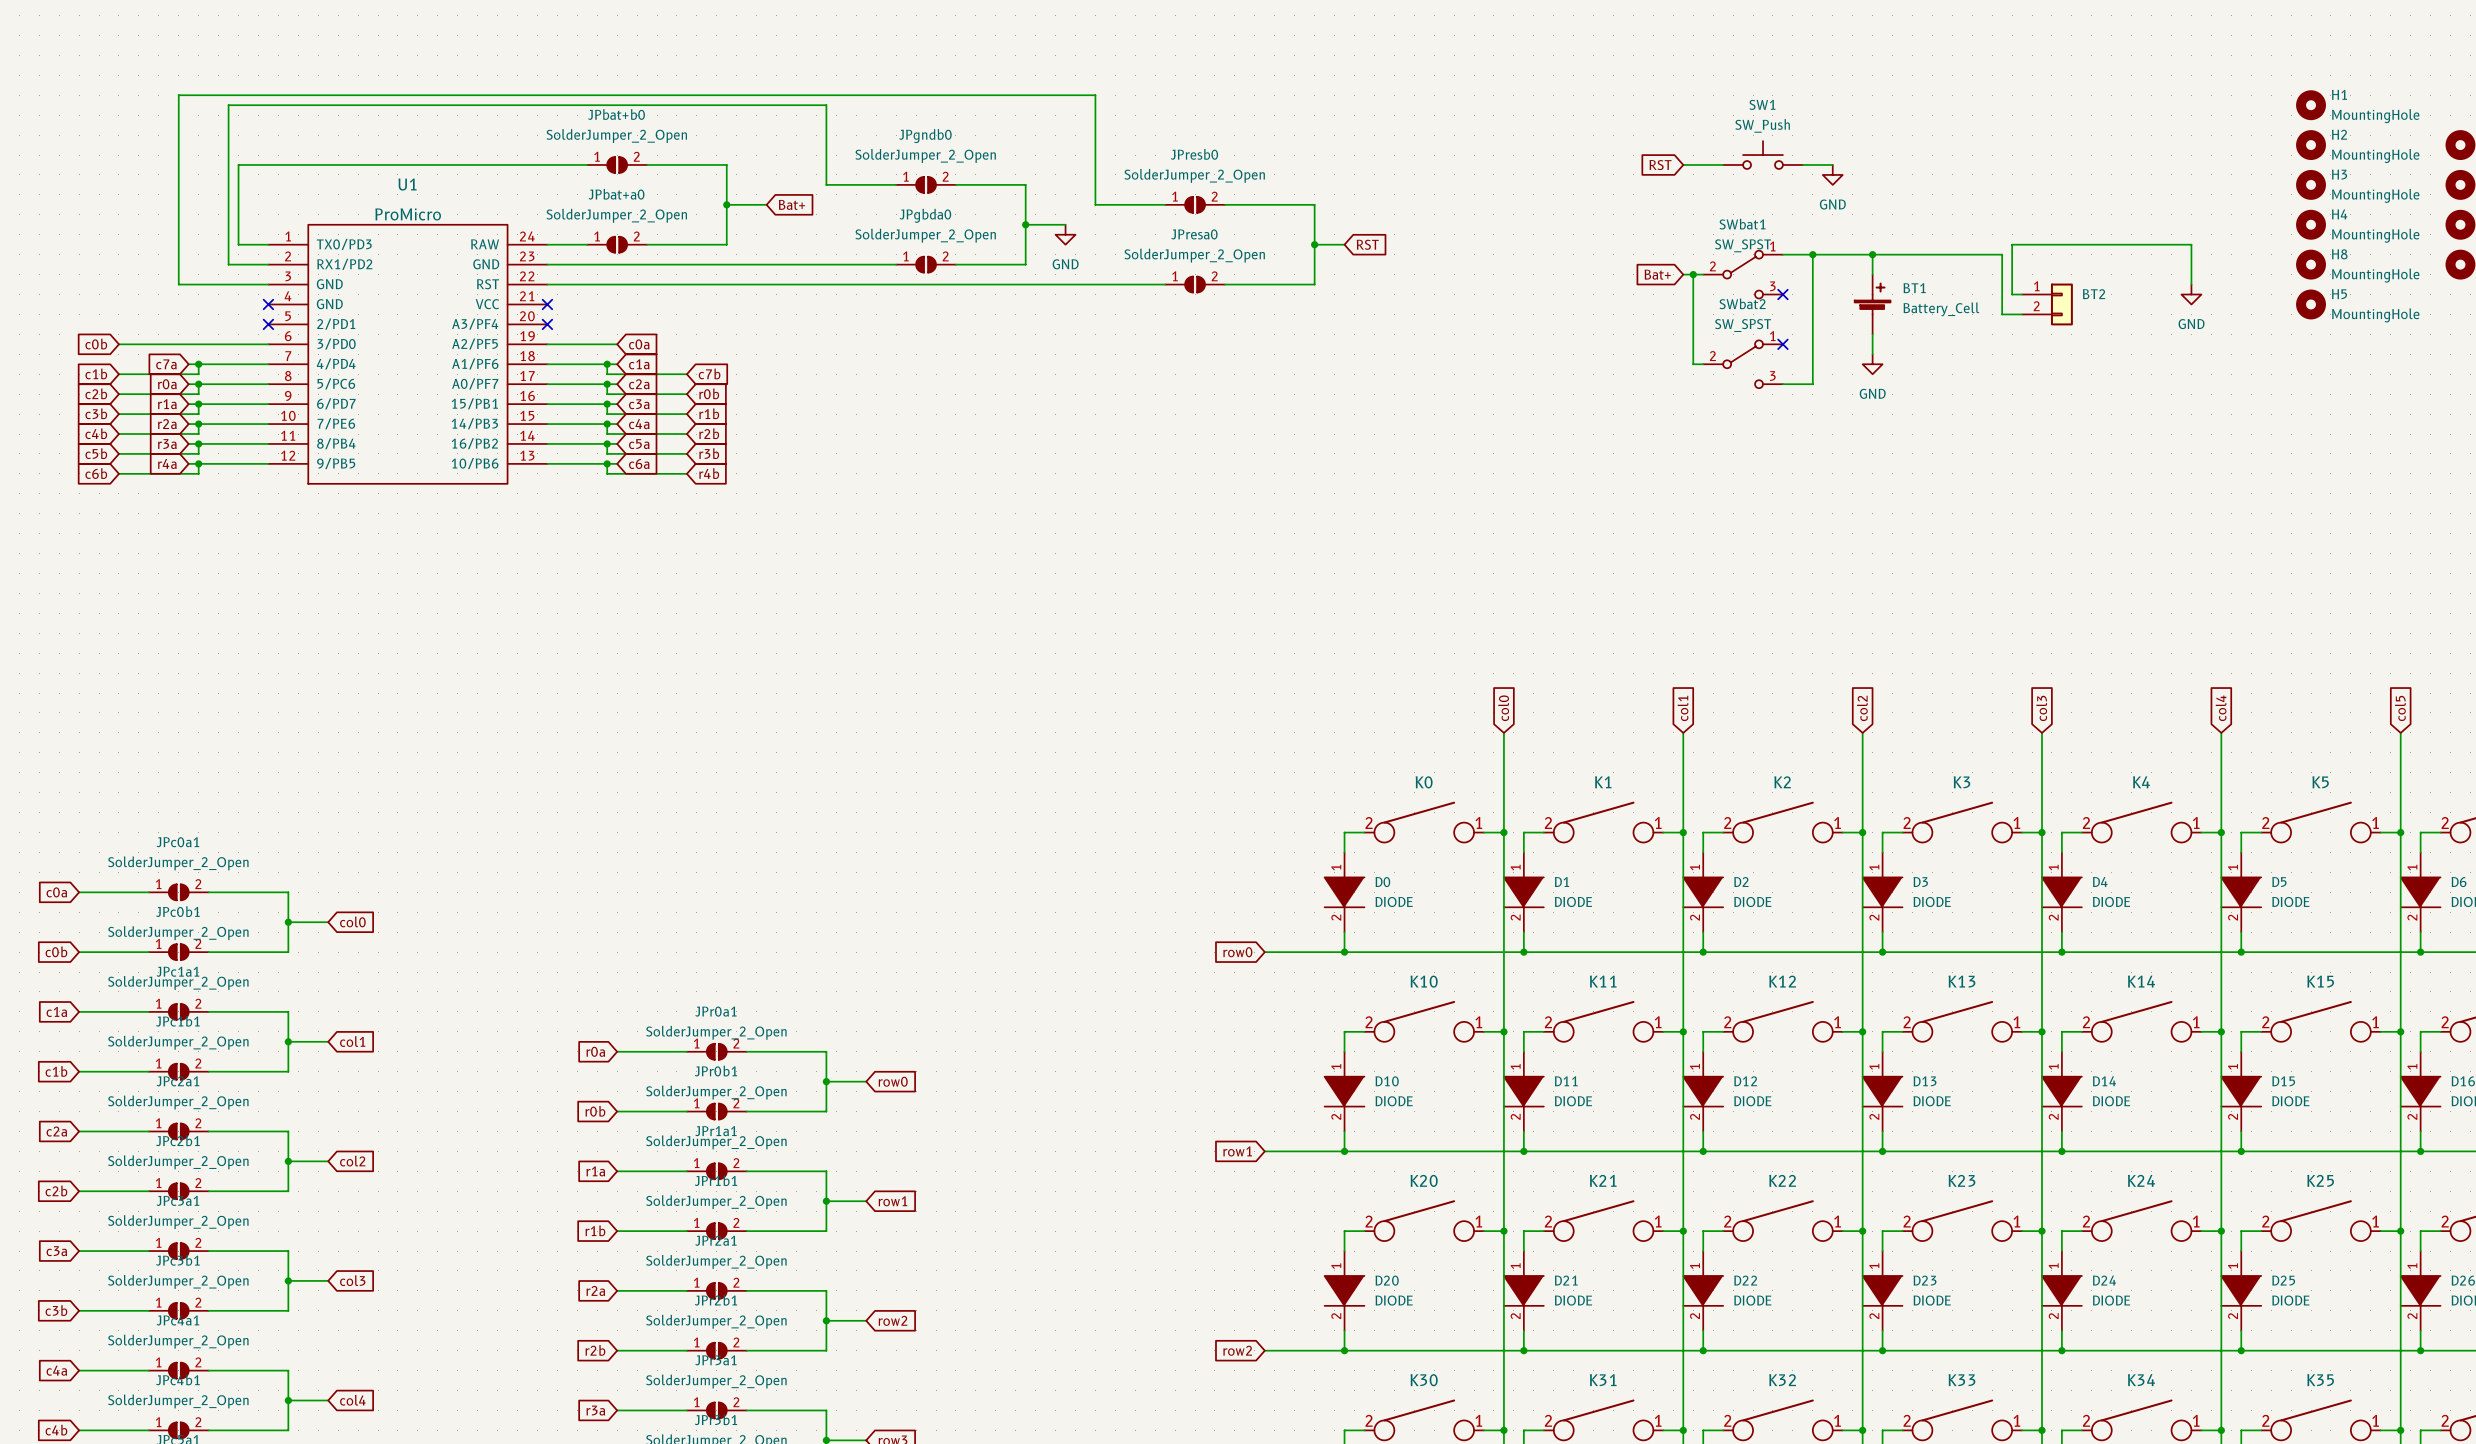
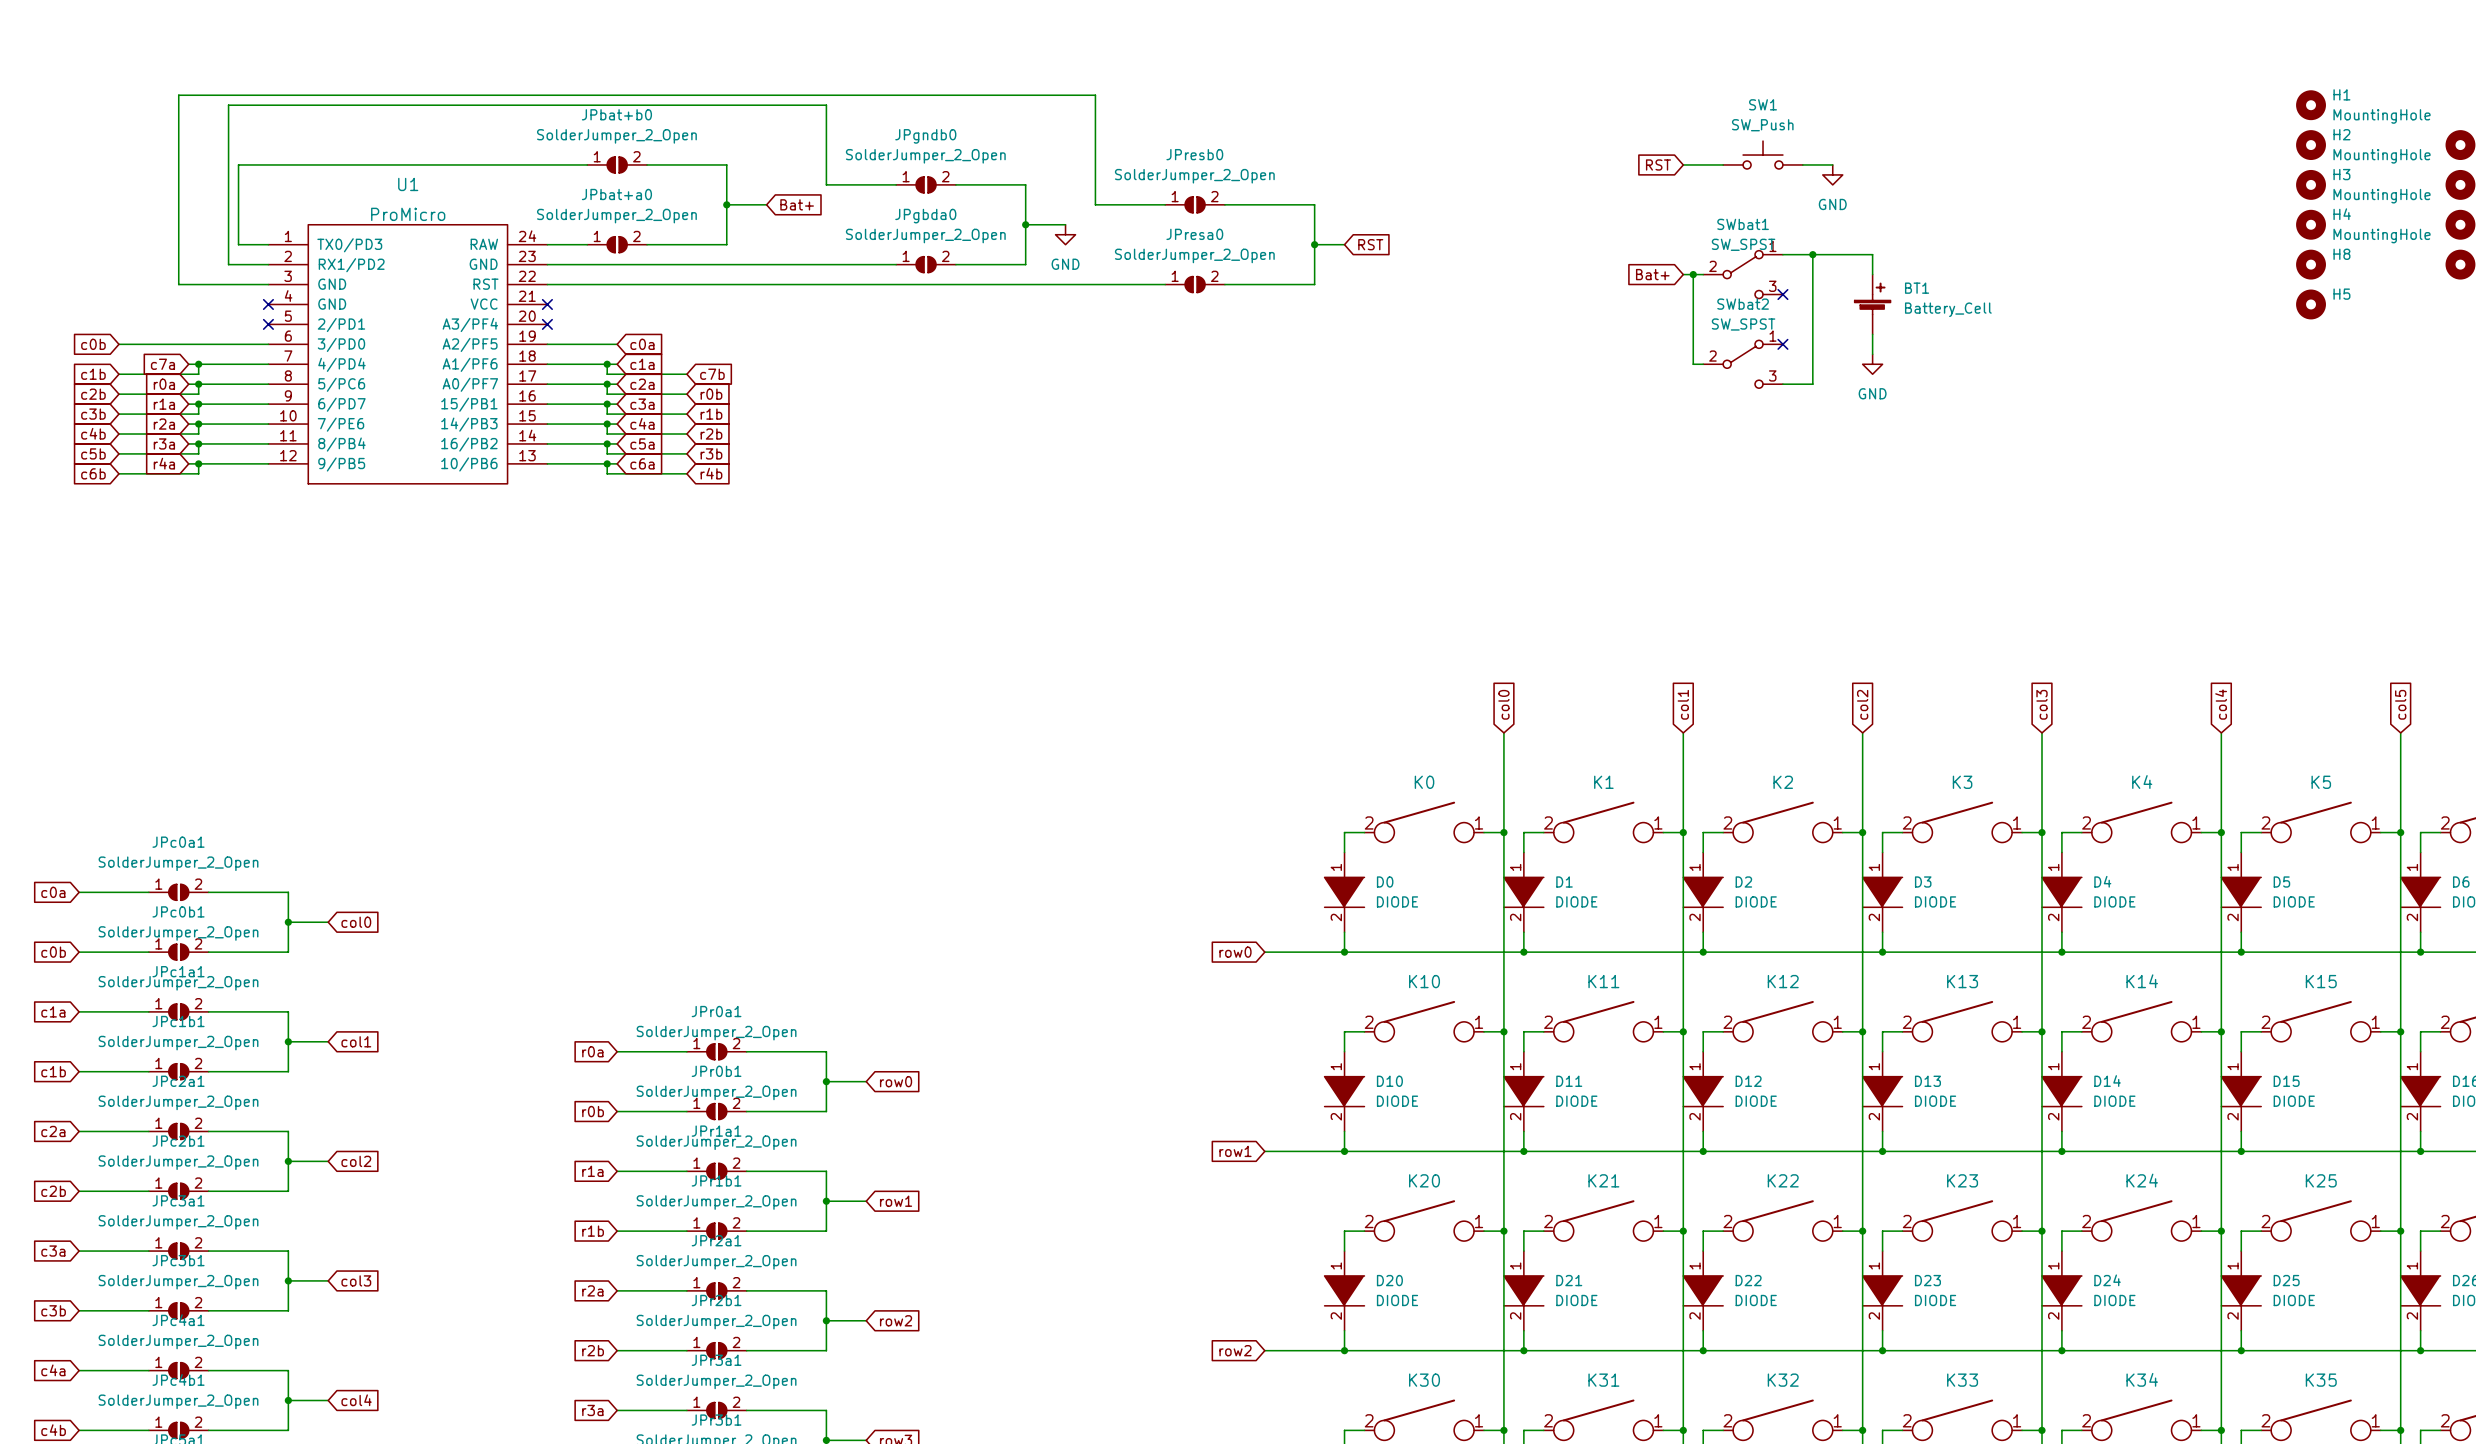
wire: (1872, 254) (2002, 254) (2002, 314) (2022, 314) -> none
junction: (1872, 254) -> none
H8 value: MountingHole (2375, 275) -> none
wire: (2191, 284) (2191, 244) (2012, 244) (2012, 294) (2022, 294) -> none
power symbol: GND (2191, 294) -> none
BT2: (2047, 304) -> none
H5 value: MountingHole (2375, 315) -> none

